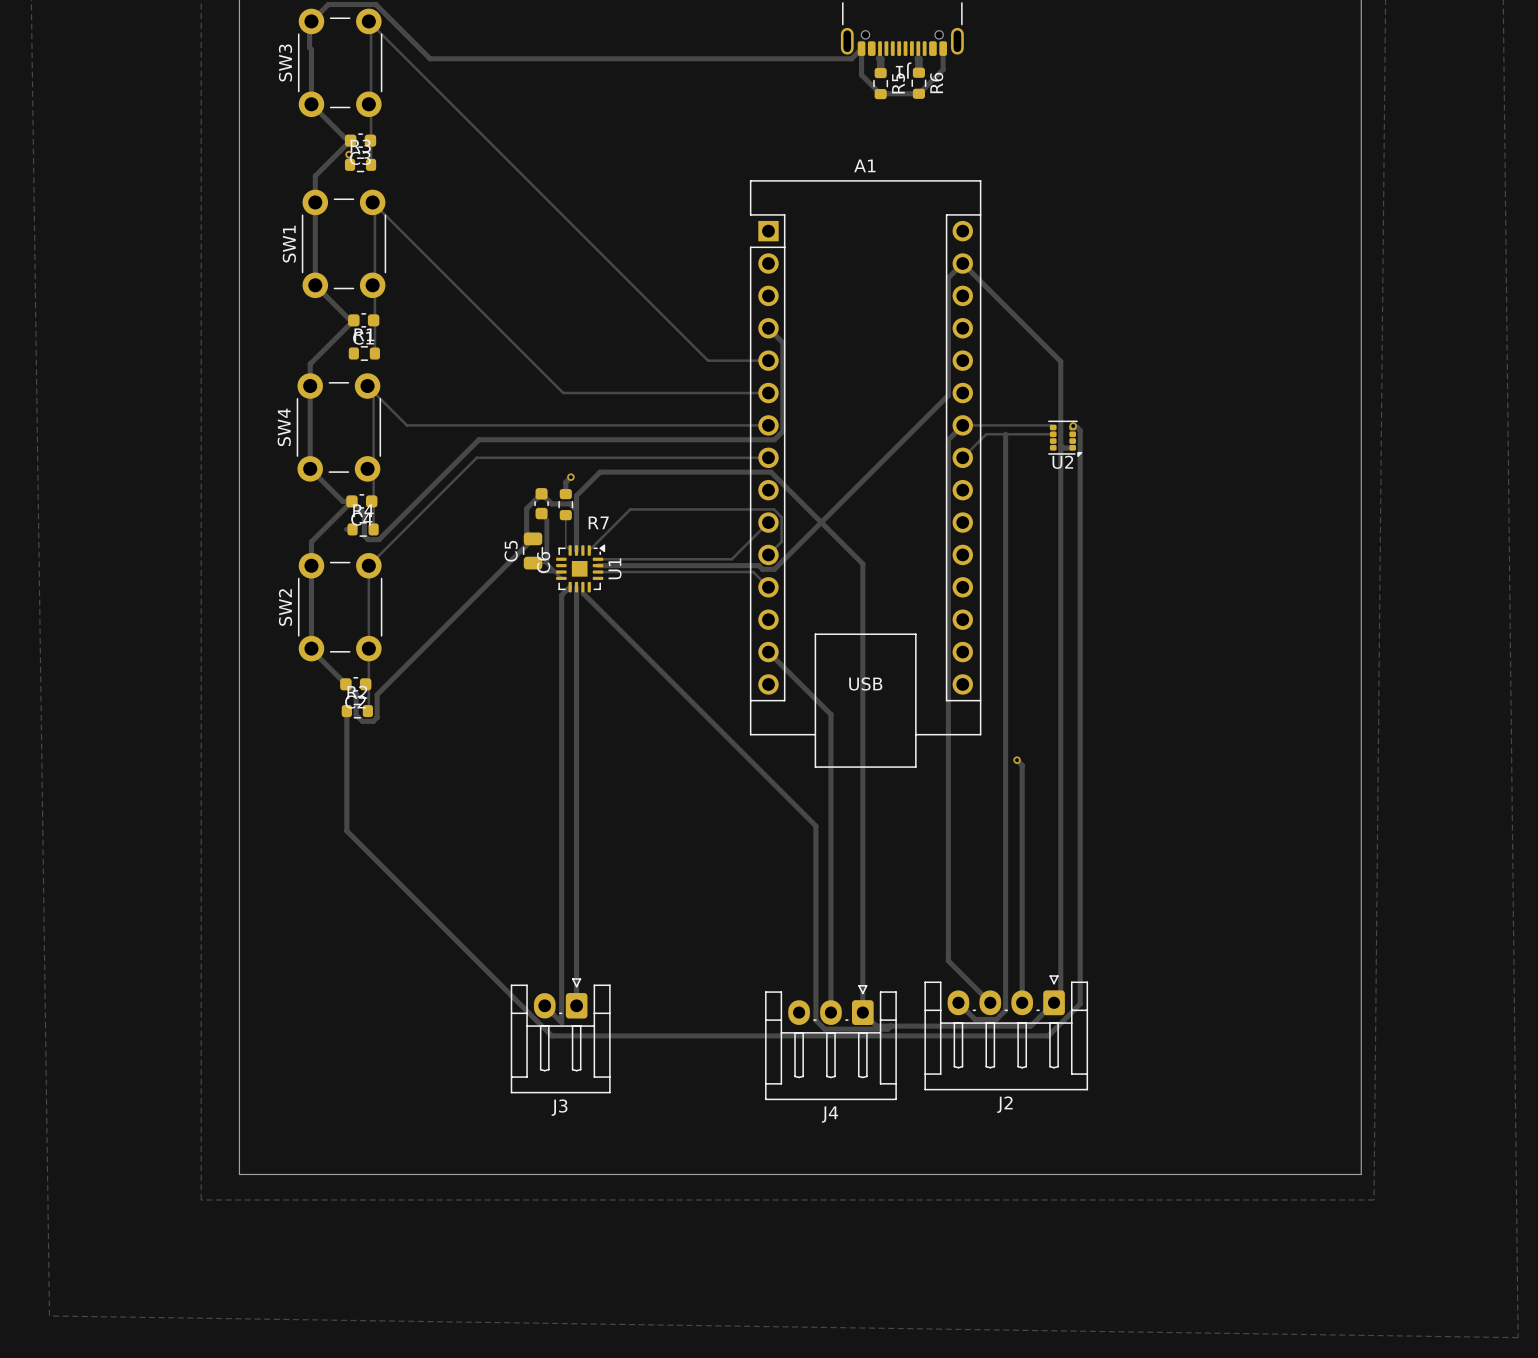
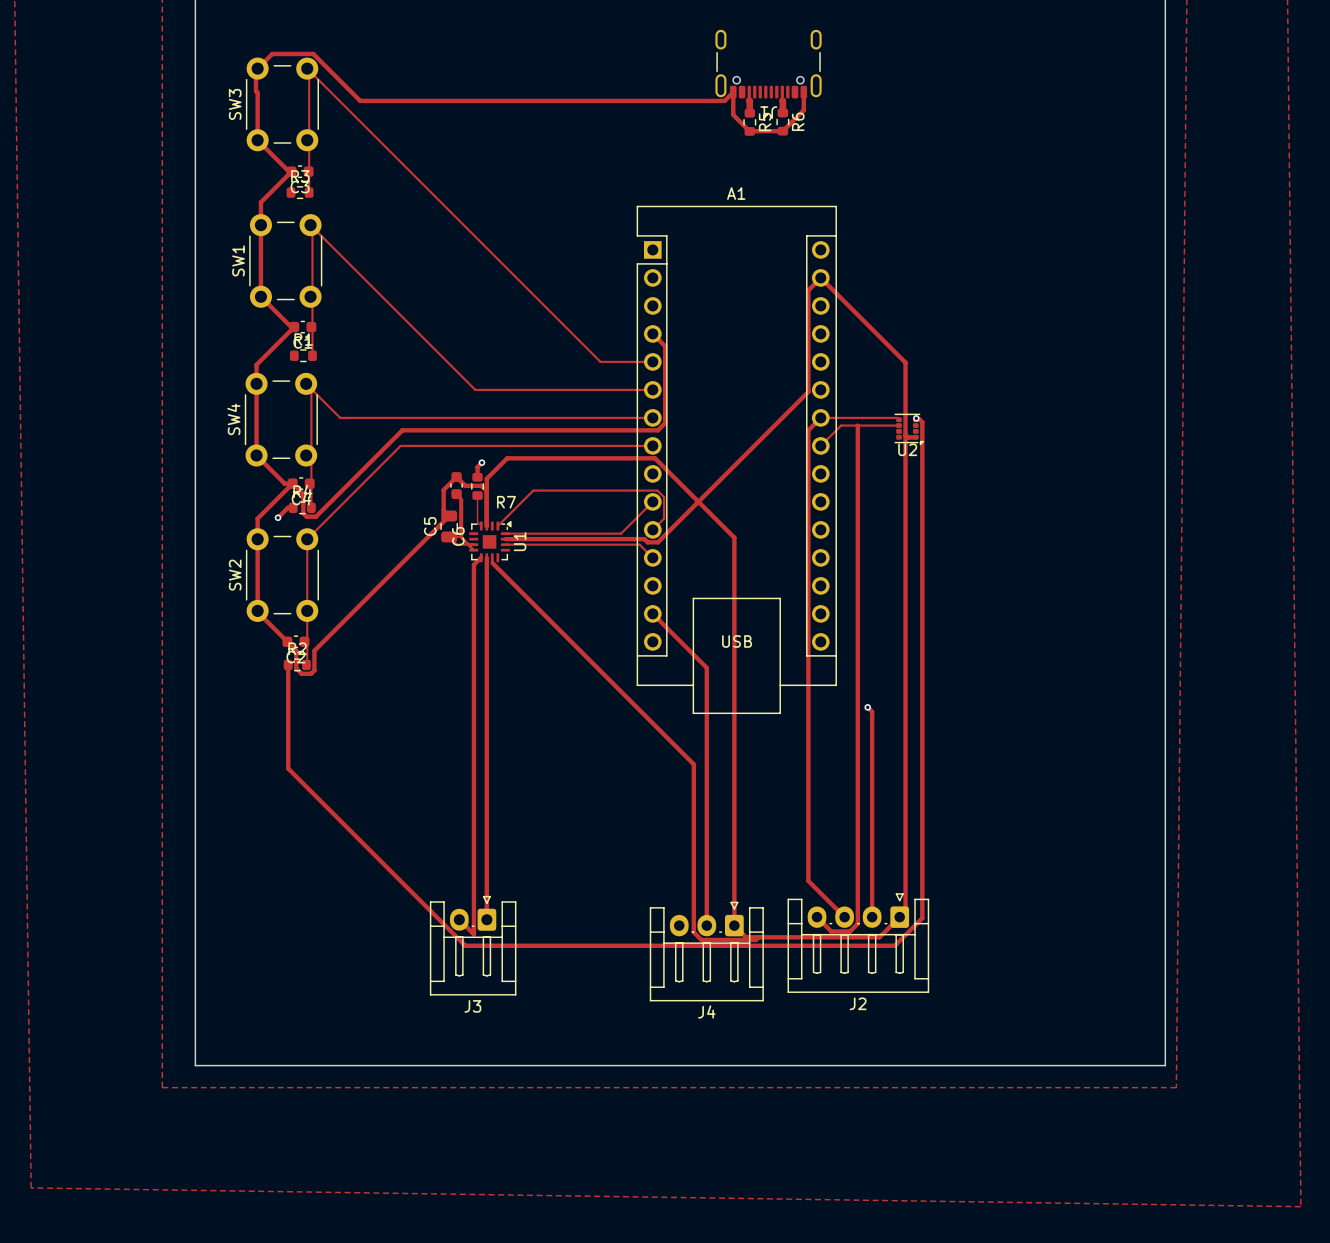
via: (349, 154) -> none
track: none -> (287, 507) (278, 517)
via: none -> (278, 517)

